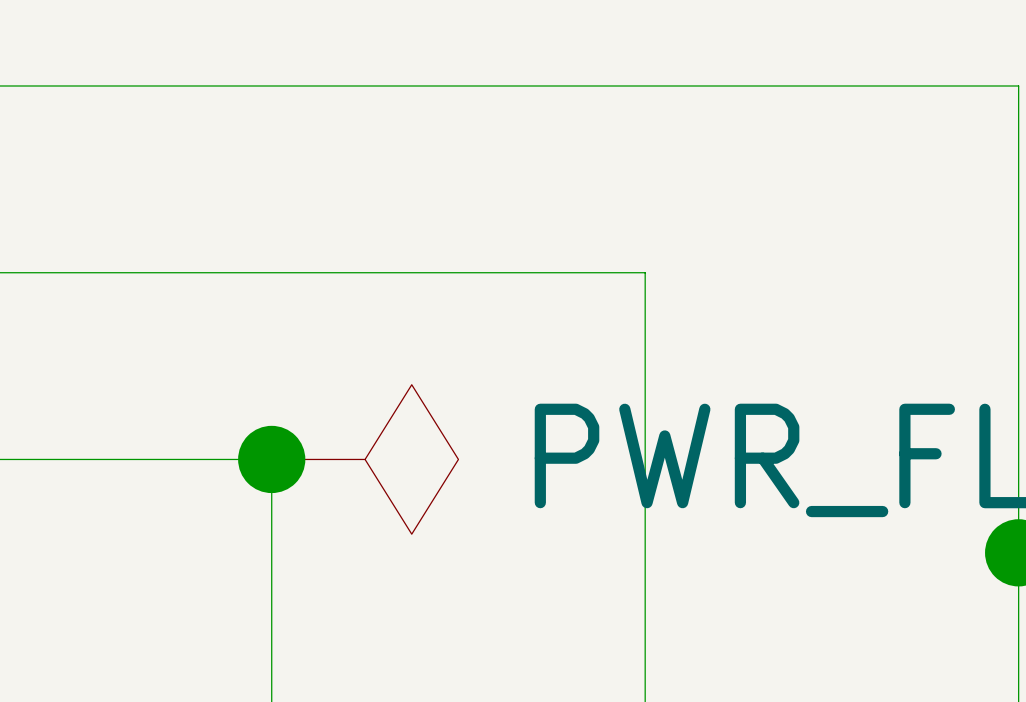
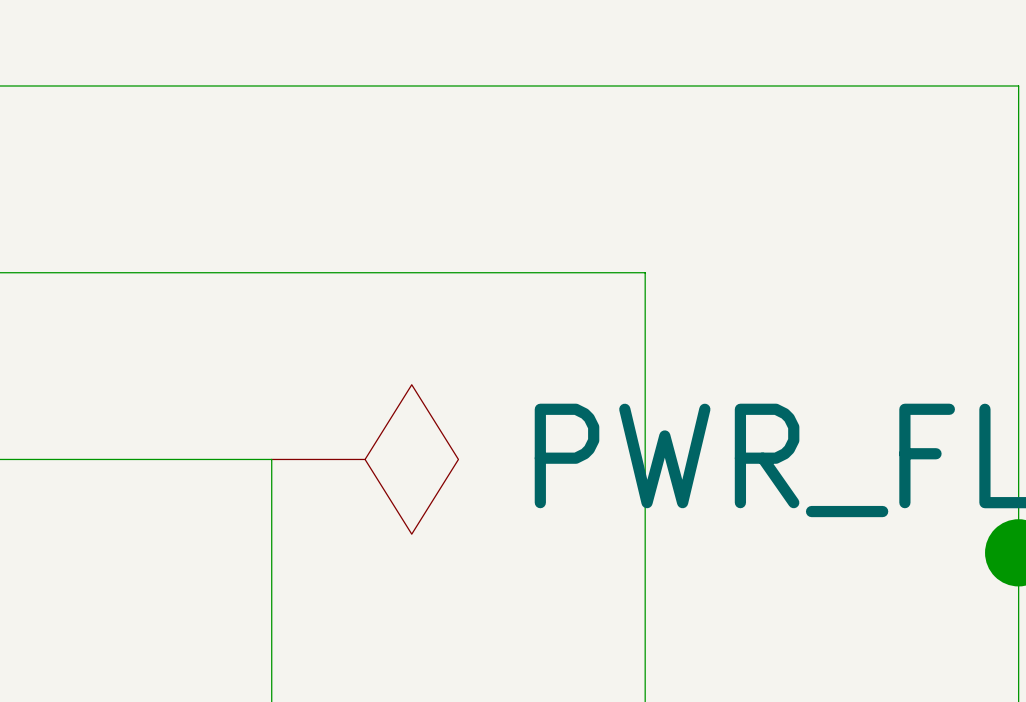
junction: (271, 459) -> none

